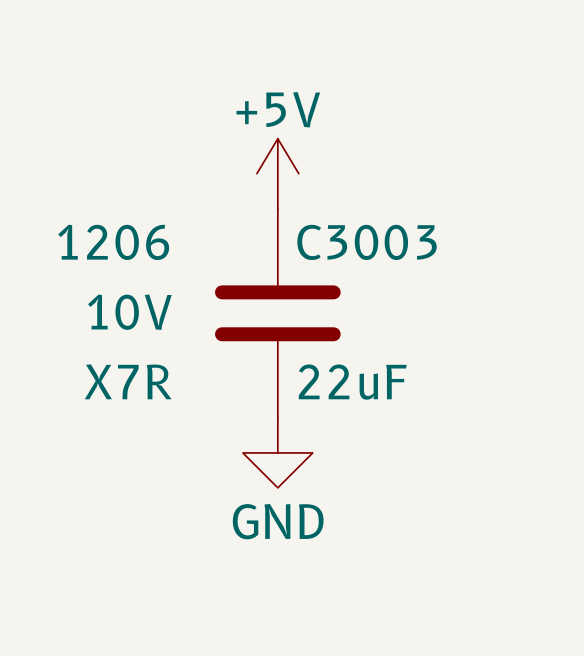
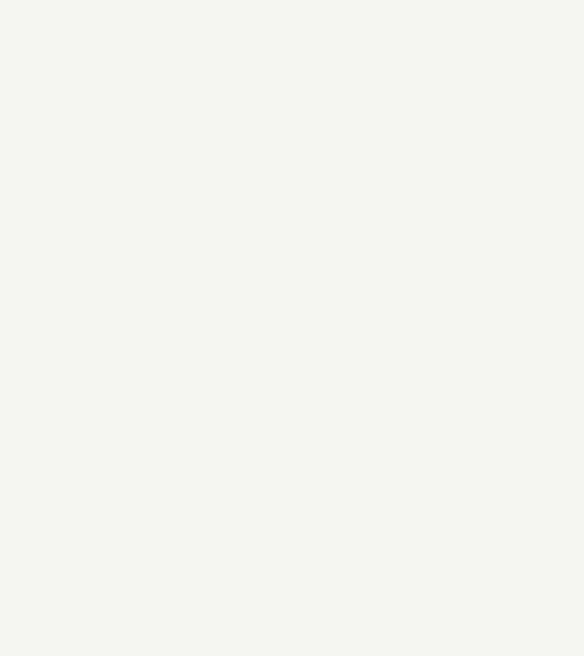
power symbol: +5V (277, 173) -> none
C3003: 22uF (277, 313) -> none
power symbol: GND (277, 452) -> none

